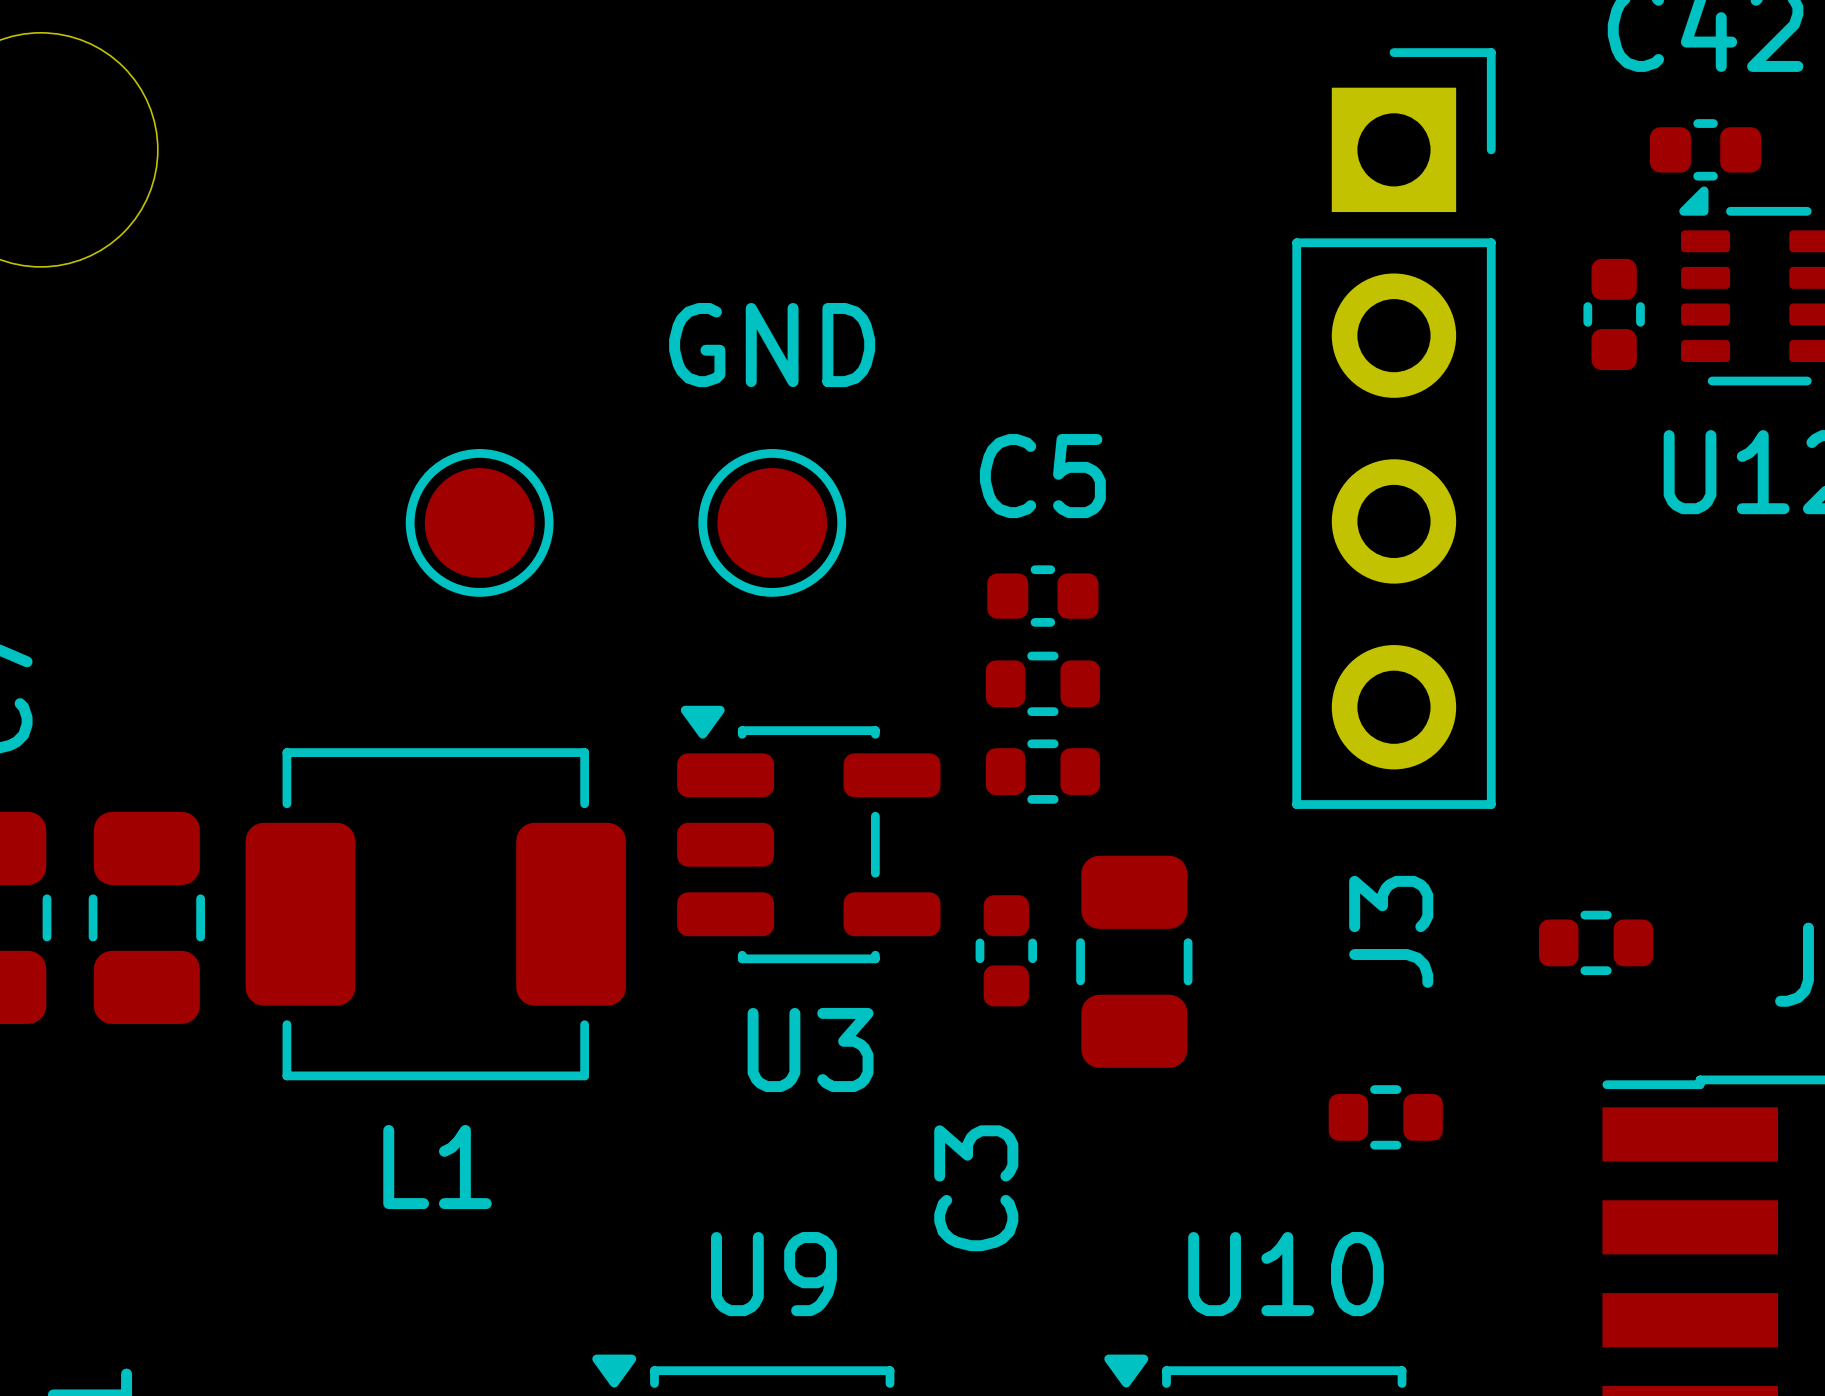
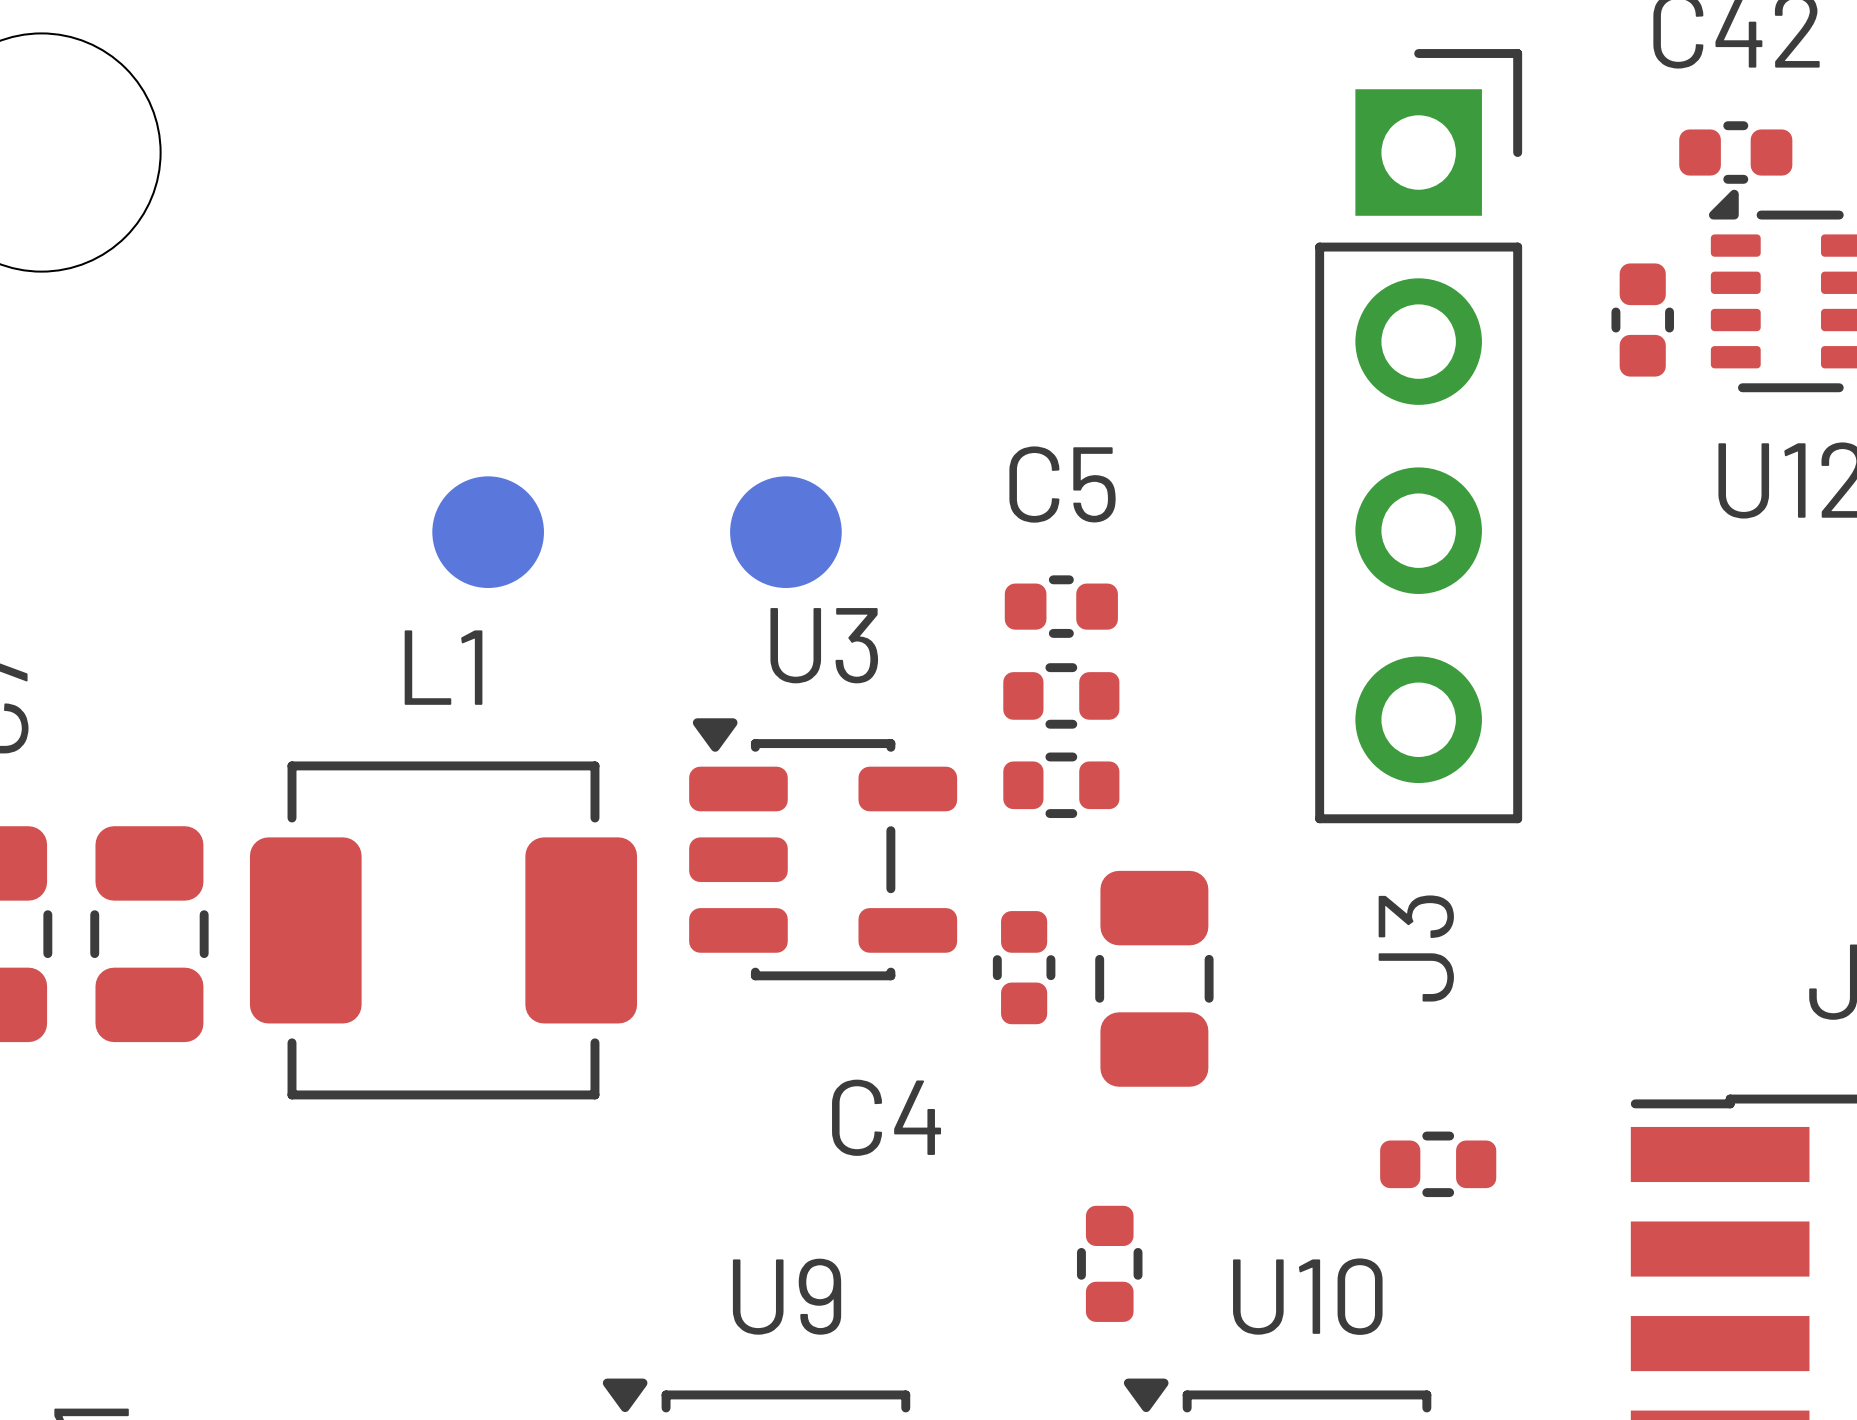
part side: top (479, 522) -> bottom (488, 532)
part side: top (772, 522) -> bottom (785, 532)
part rotation: 0° (1596, 942) -> 90° clockwise (1109, 1263)
part position: (1596, 942) -> (1109, 1263)
U3 name position: U3 (810, 1049) -> U3 (824, 645)
C4 name: none -> C4 (886, 1117)
part position: (1385, 1117) -> (1438, 1164)
L1 name position: L1 (437, 1167) -> L1 (443, 667)
C3 name: C3 (976, 1188) -> none

